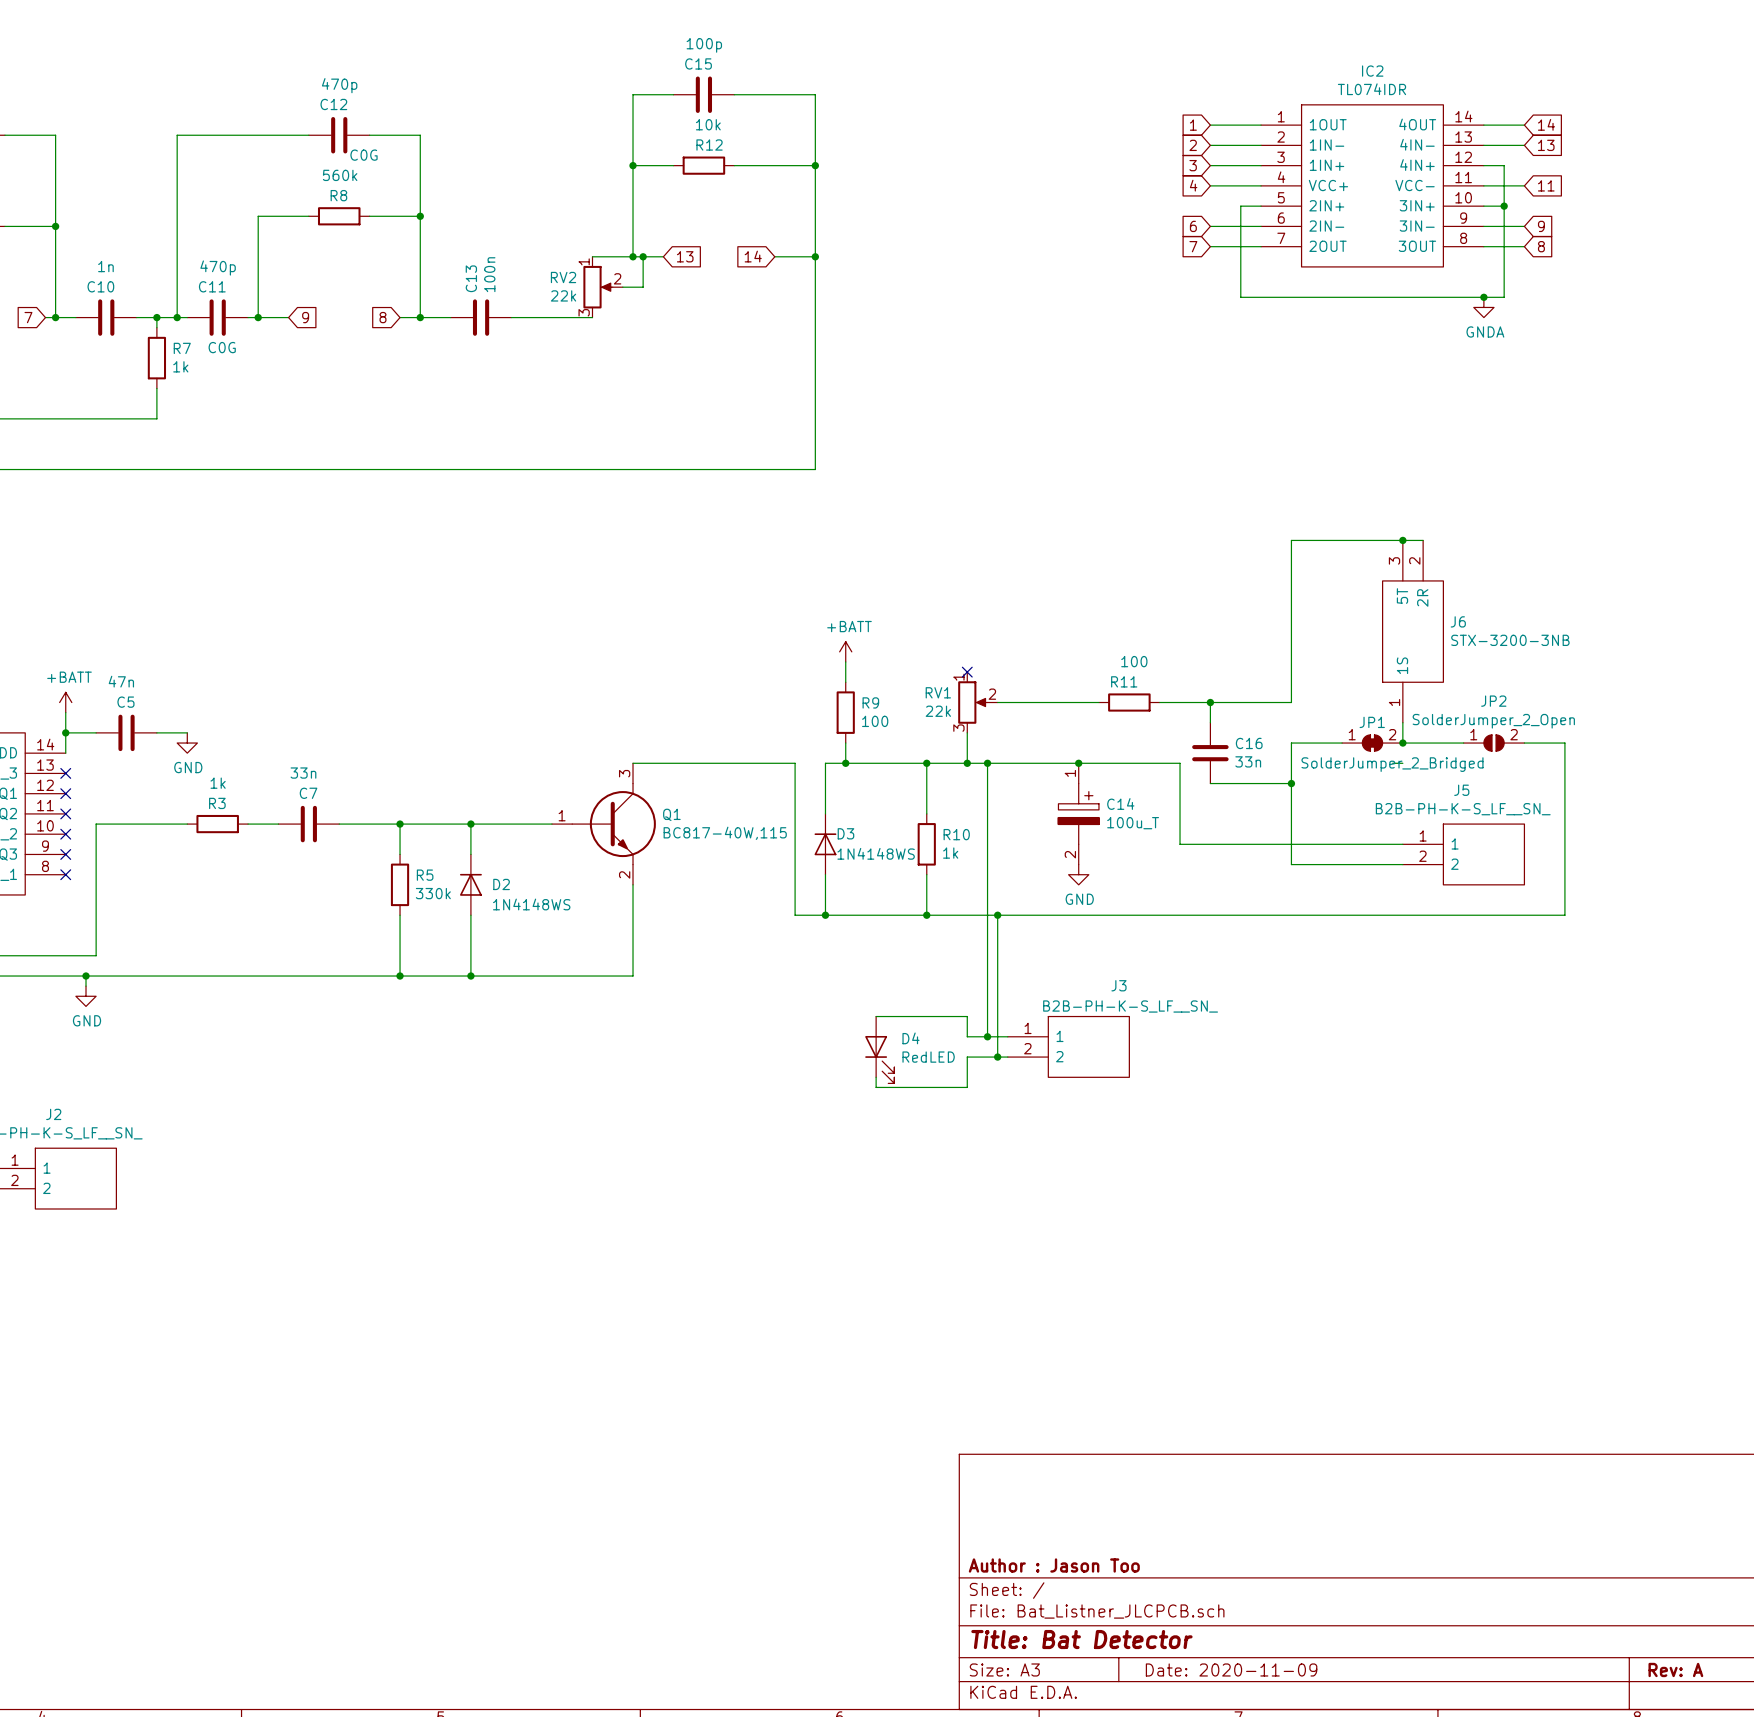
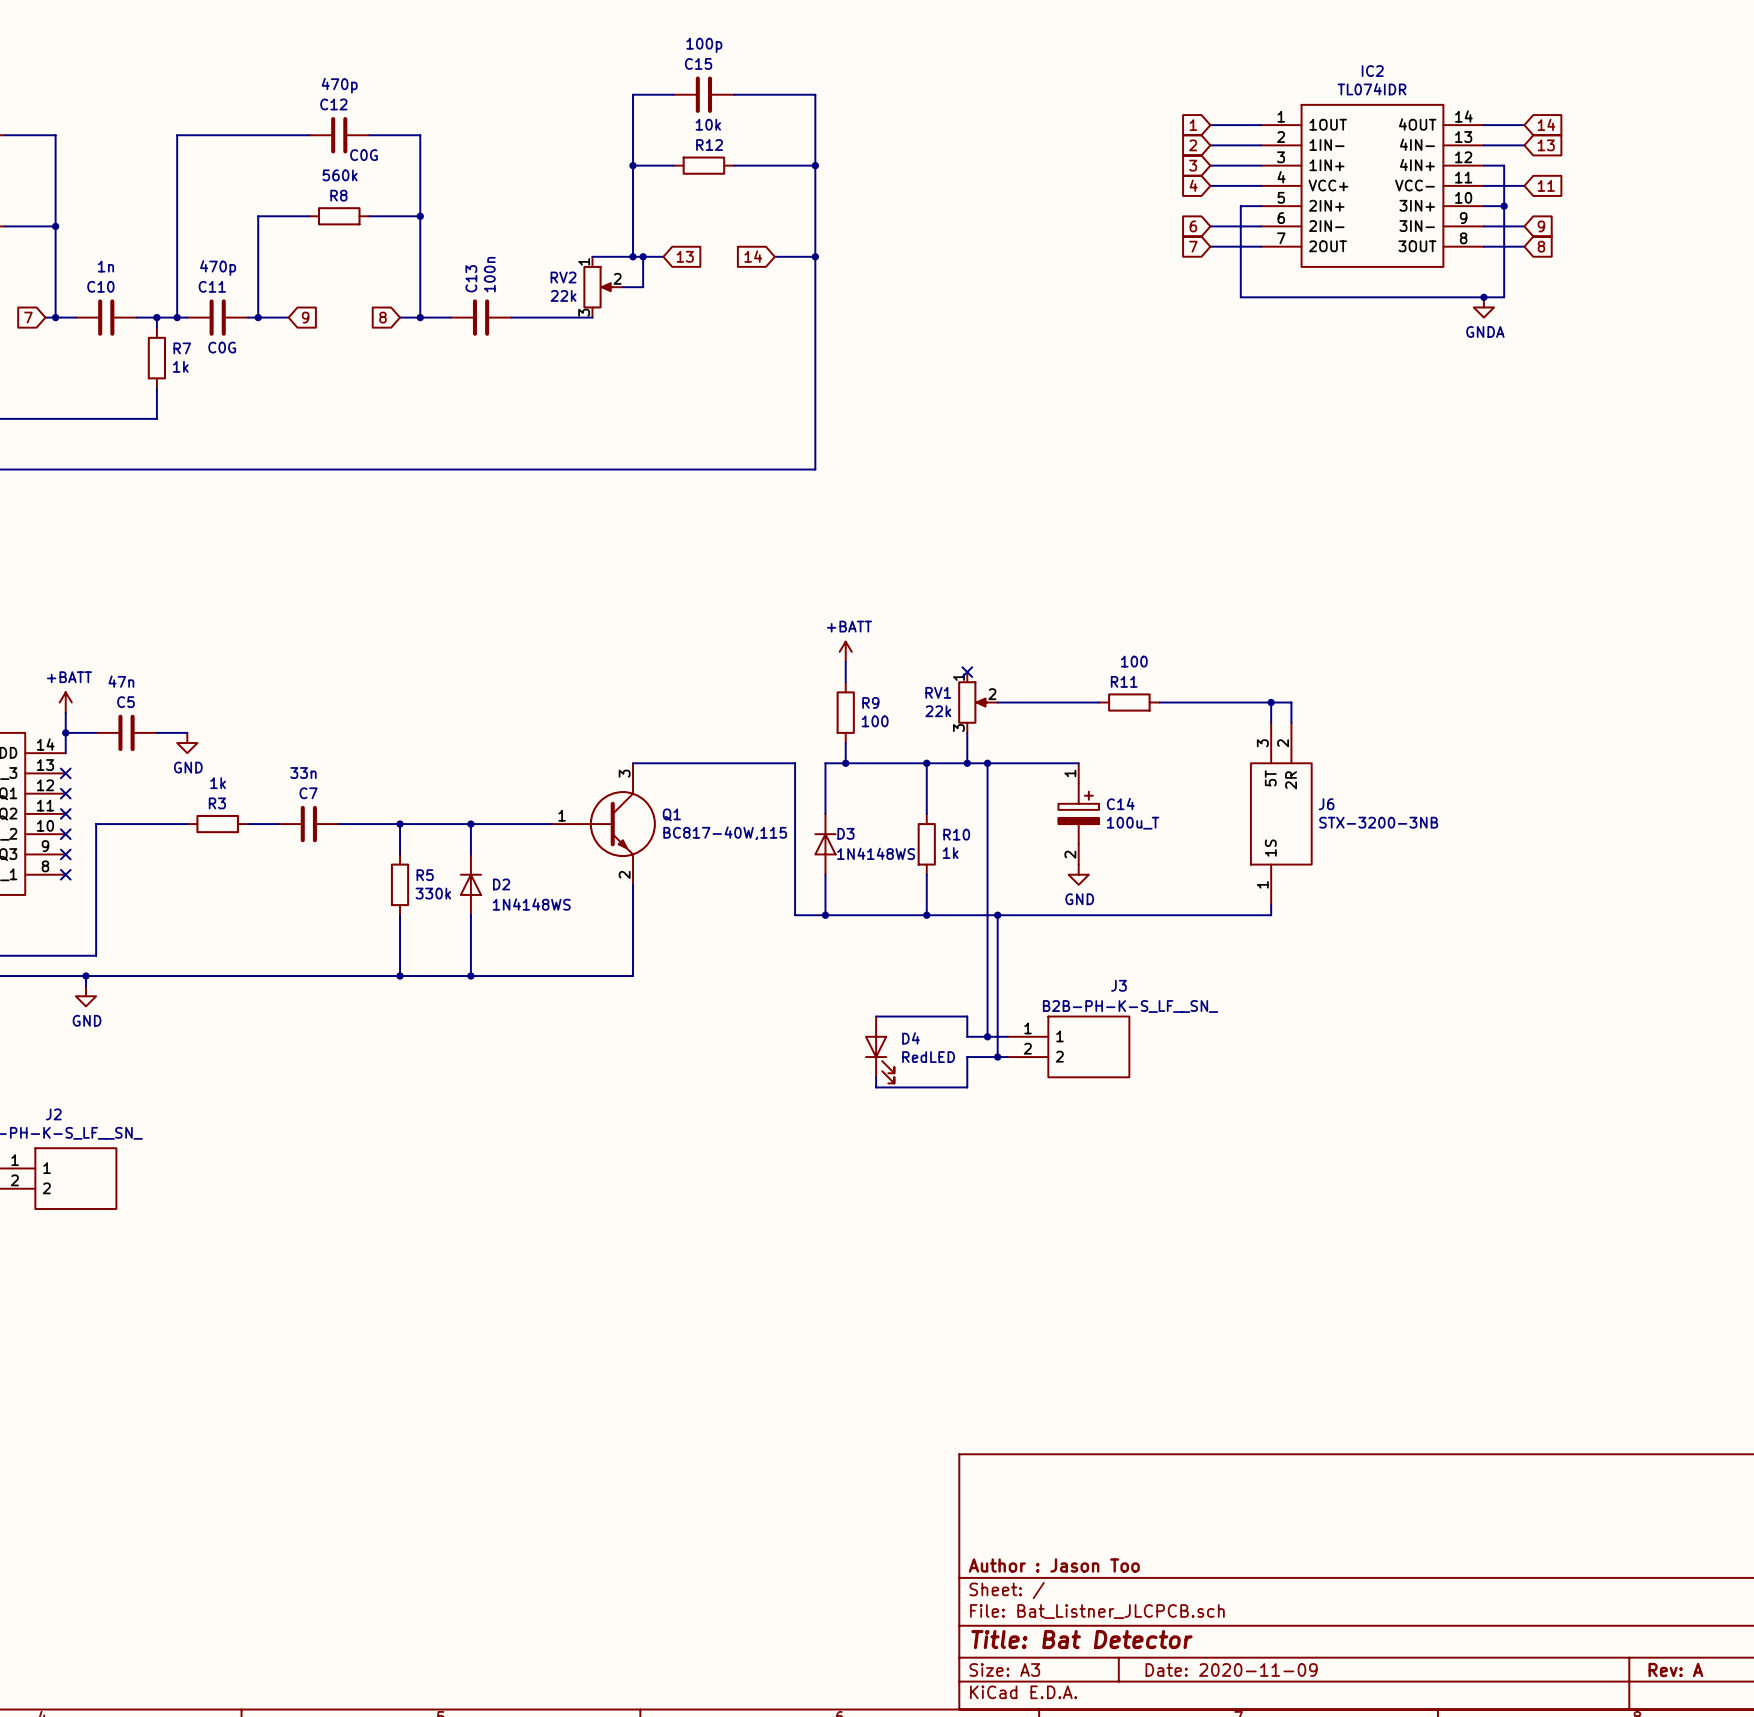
junction: (1402, 540) -> none
wire: (1423, 540) (1291, 540) (1291, 702) -> (1291, 722) (1291, 702)
J6 position: (1412, 631) -> (1281, 813)
wire: (1210, 702) (1210, 722) -> (1271, 702) (1271, 722)
junction: (1210, 702) -> none
junction: none -> (1271, 702)
wire: (1402, 722) (1402, 743) (1463, 743) -> none
wire: (1342, 743) (1291, 743) (1291, 864) (1402, 864) -> none
JP1: SolderJumper_2_Bridged (1372, 743) -> none
junction: (1402, 743) -> none
JP2: SolderJumper_2_Open (1494, 743) -> none
wire: (1524, 743) (1564, 743) (1564, 915) (1271, 915) -> (1271, 905) (1271, 915)
C16: 33n (1210, 753) -> none
wire: (1078, 763) (1180, 763) (1180, 844) (1402, 844) -> none
junction: (1078, 763) -> none
wire: (1392, 763) (1402, 763) -> none
wire: (1210, 783) (1291, 783) -> none
junction: (1291, 783) -> none
J5: B2B-PH-K-S_LF__SN_ (1463, 854) -> none

